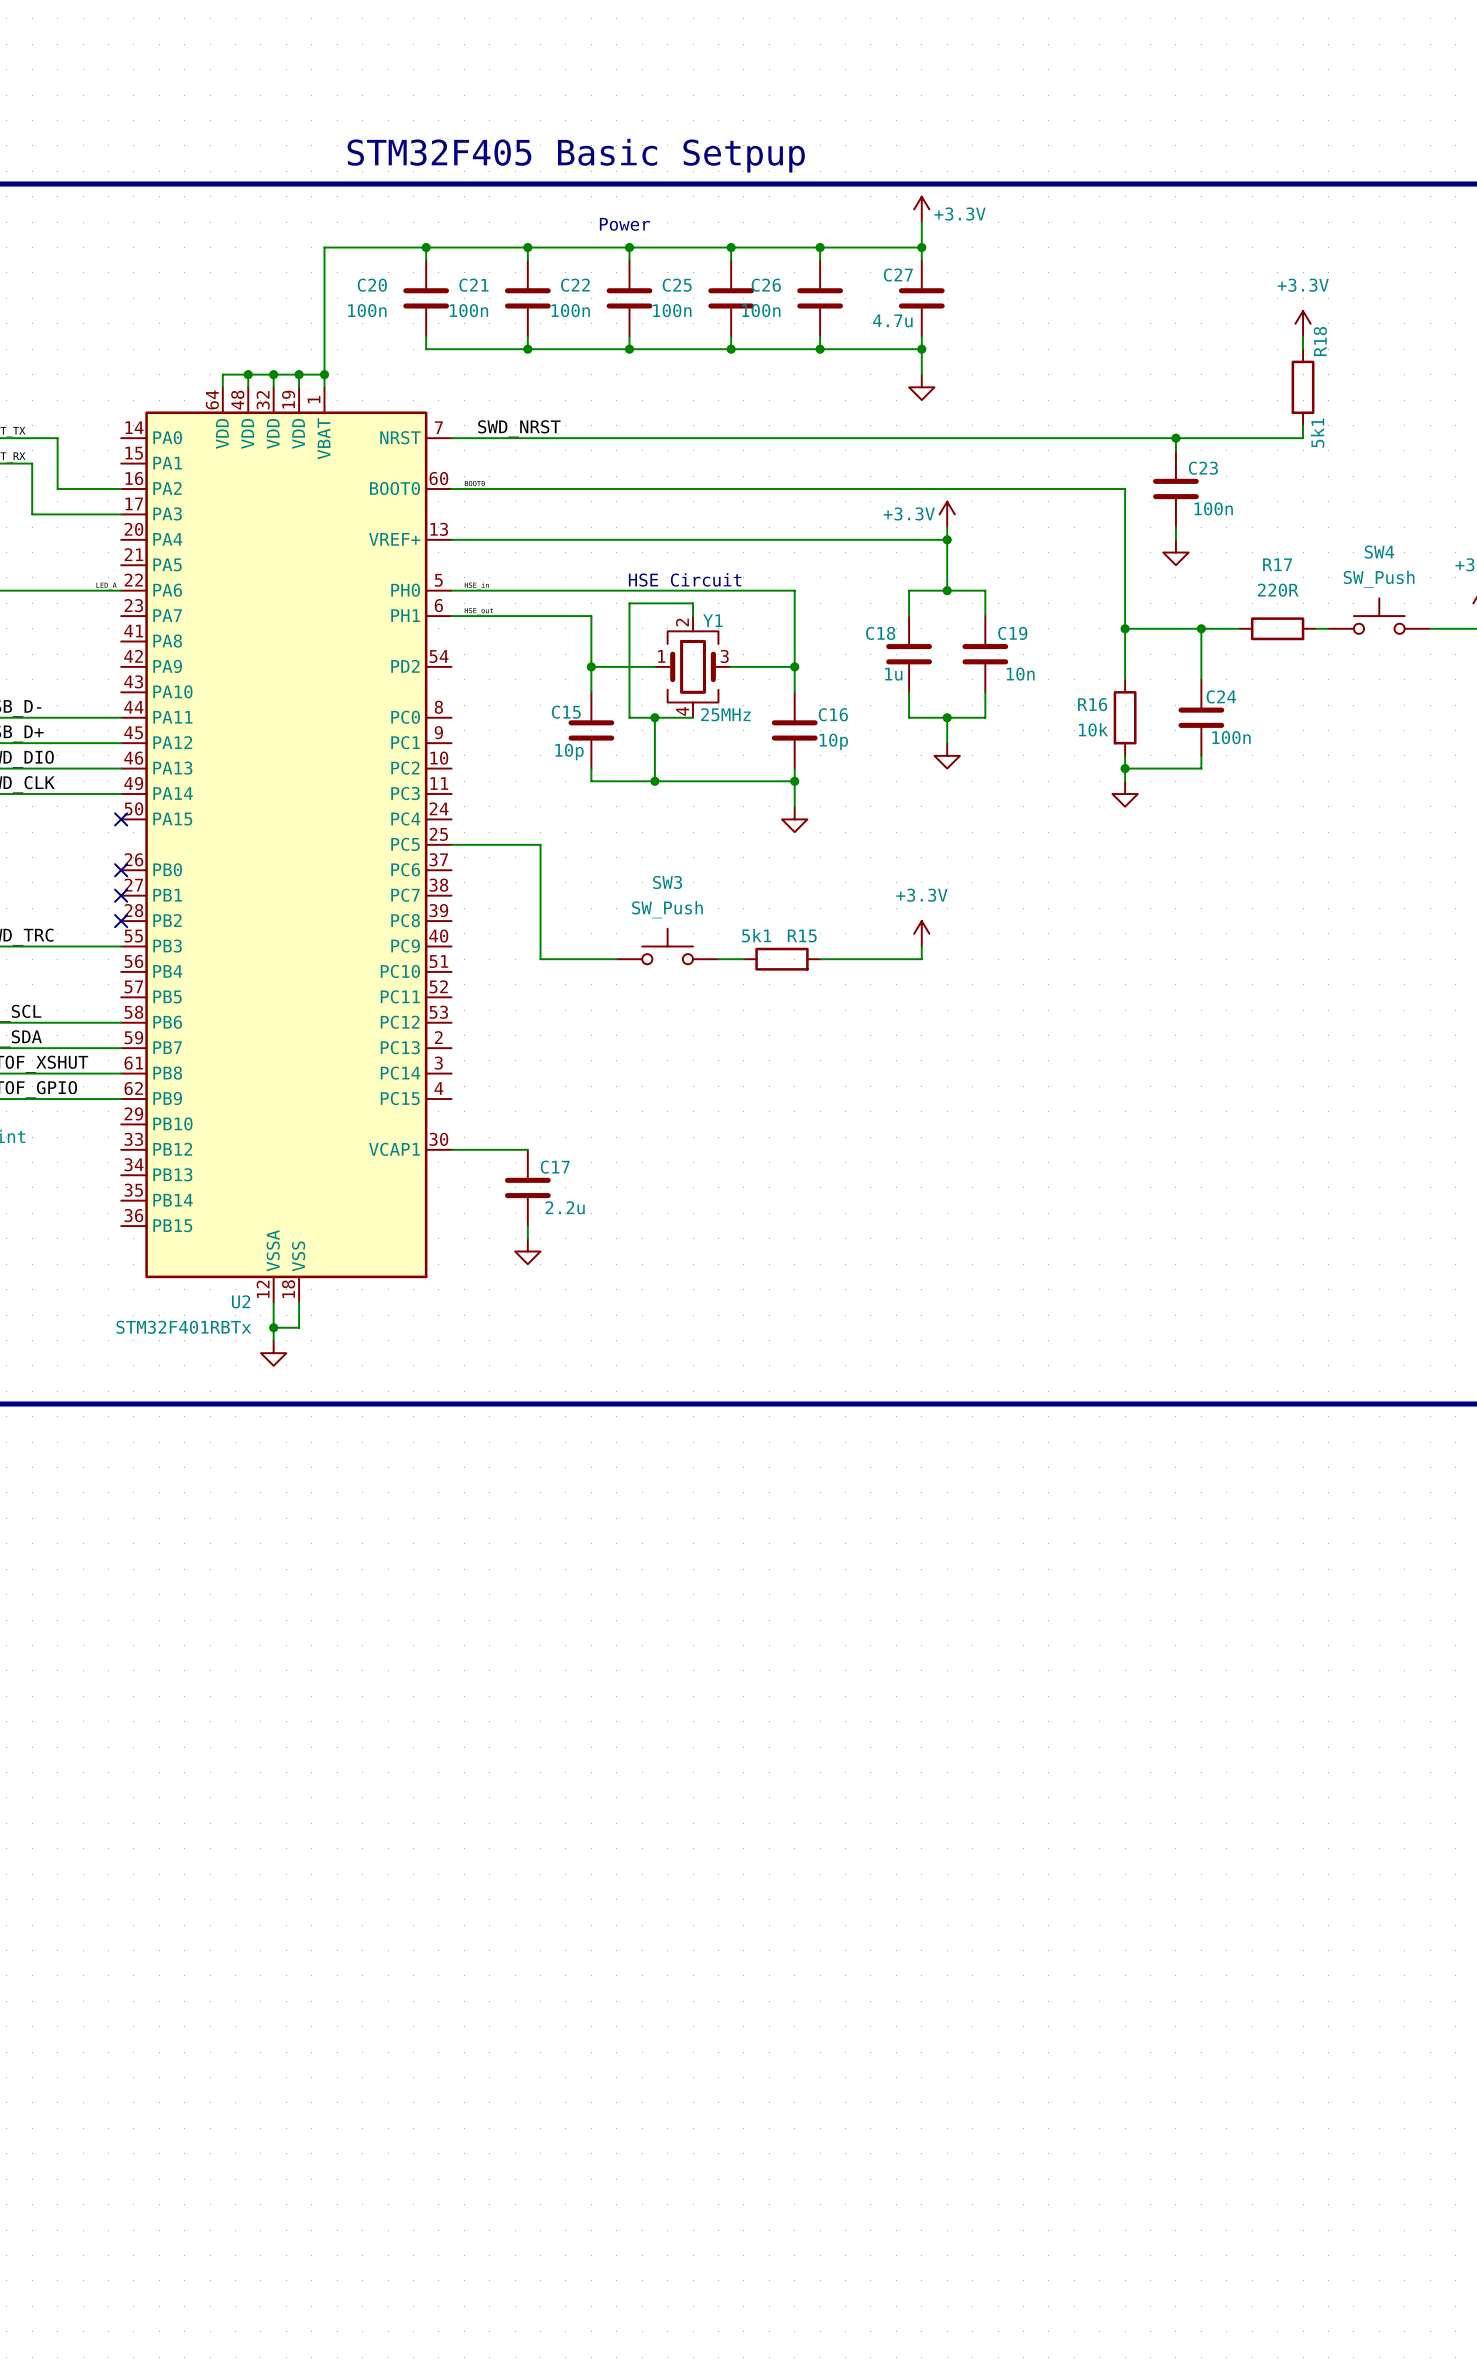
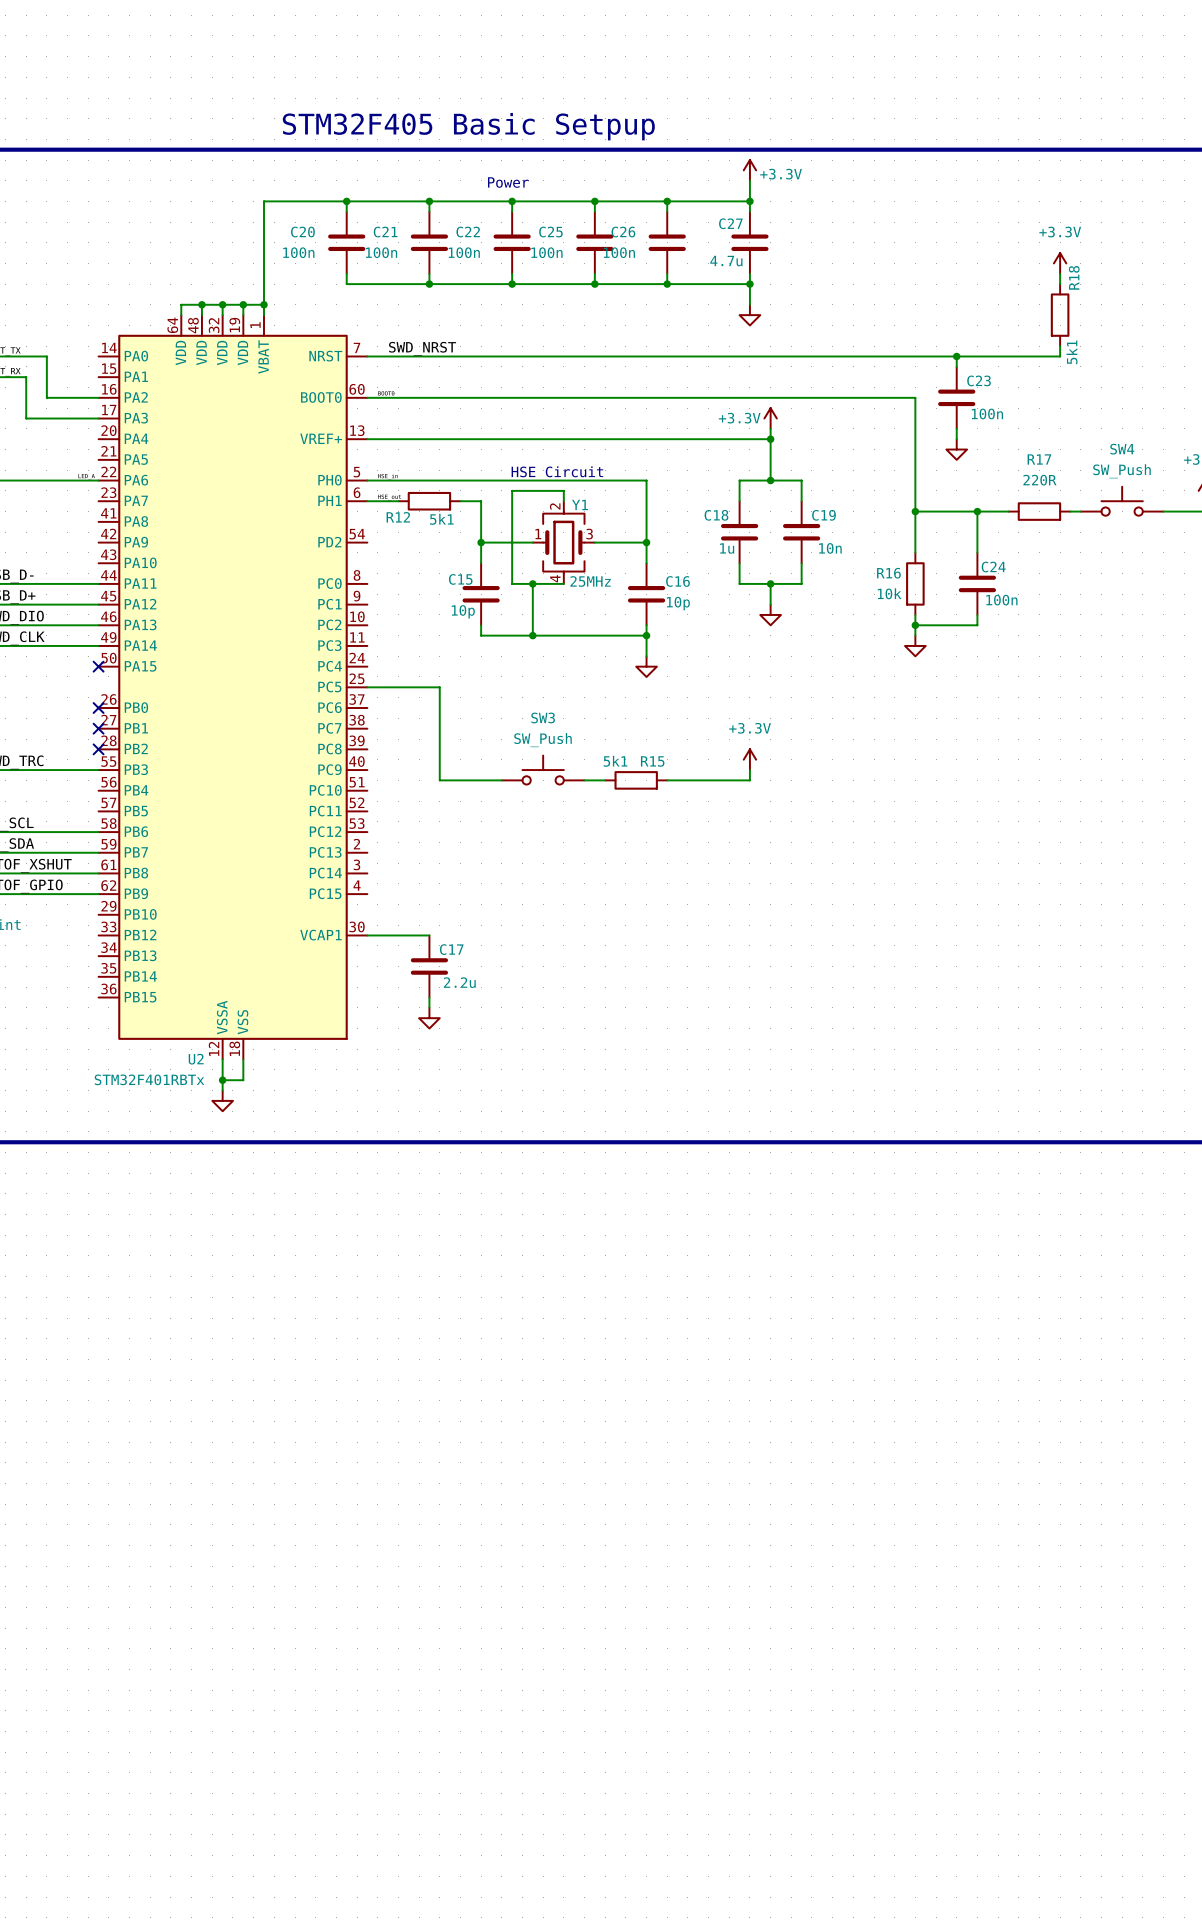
wire: (489, 616) (565, 616) -> none
R12: none -> 5k1 (429, 501)

